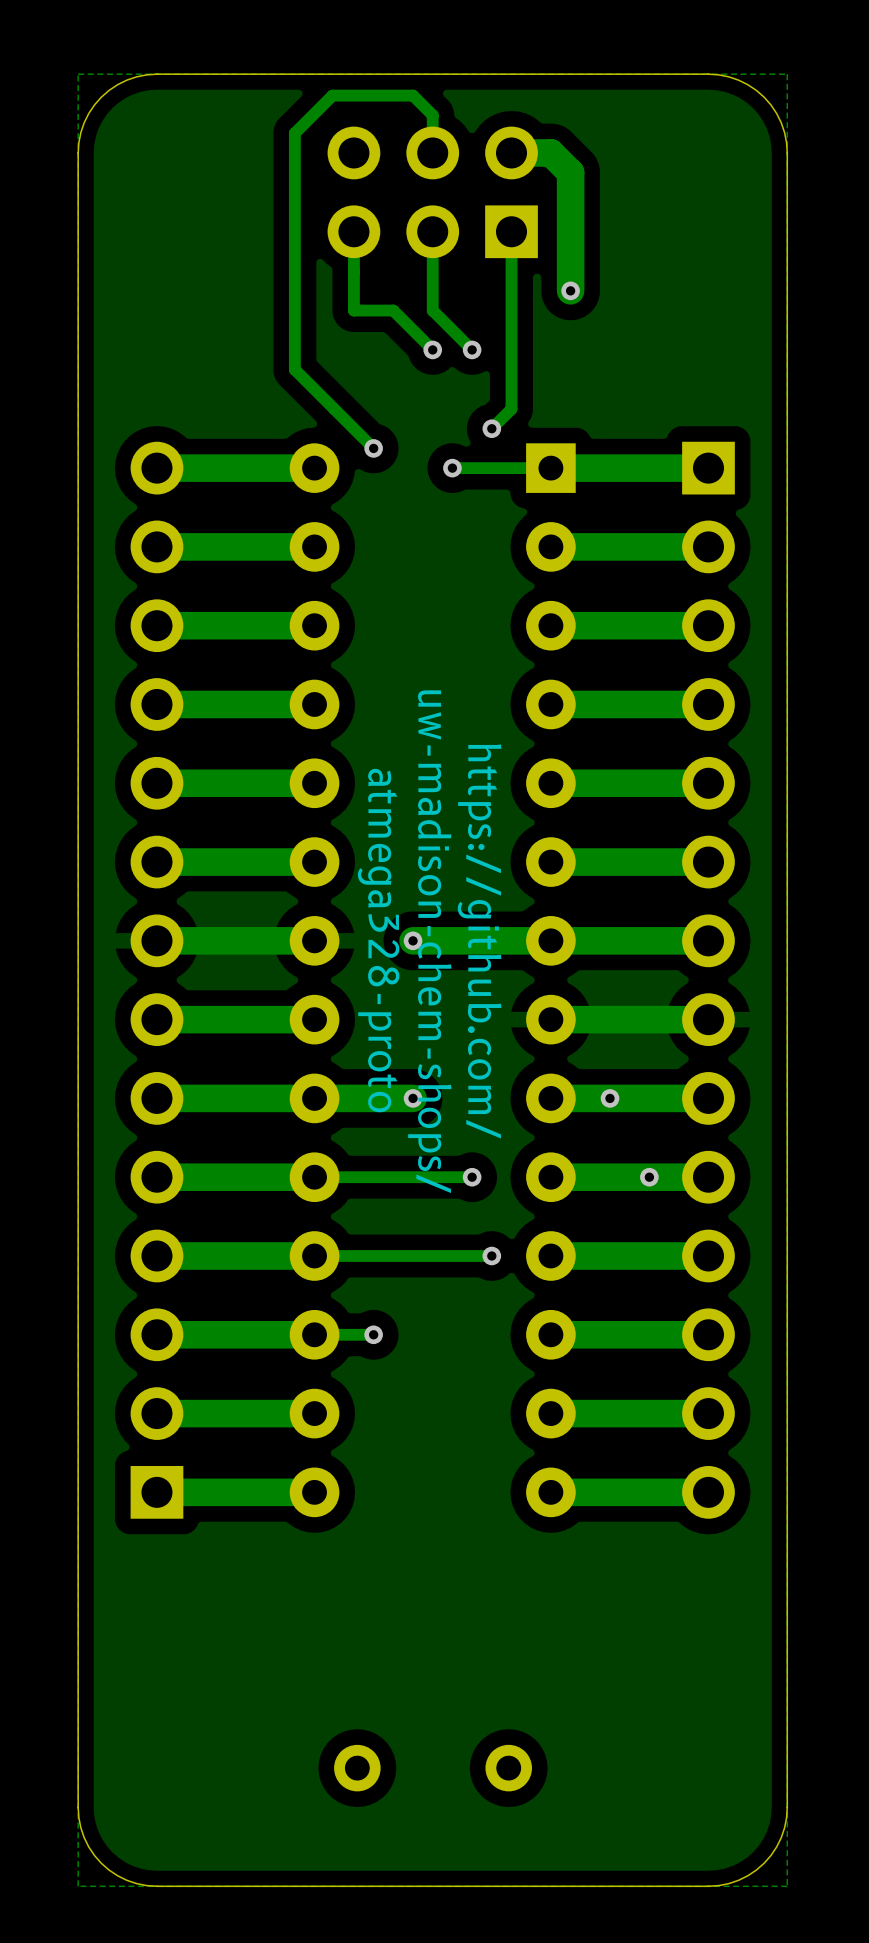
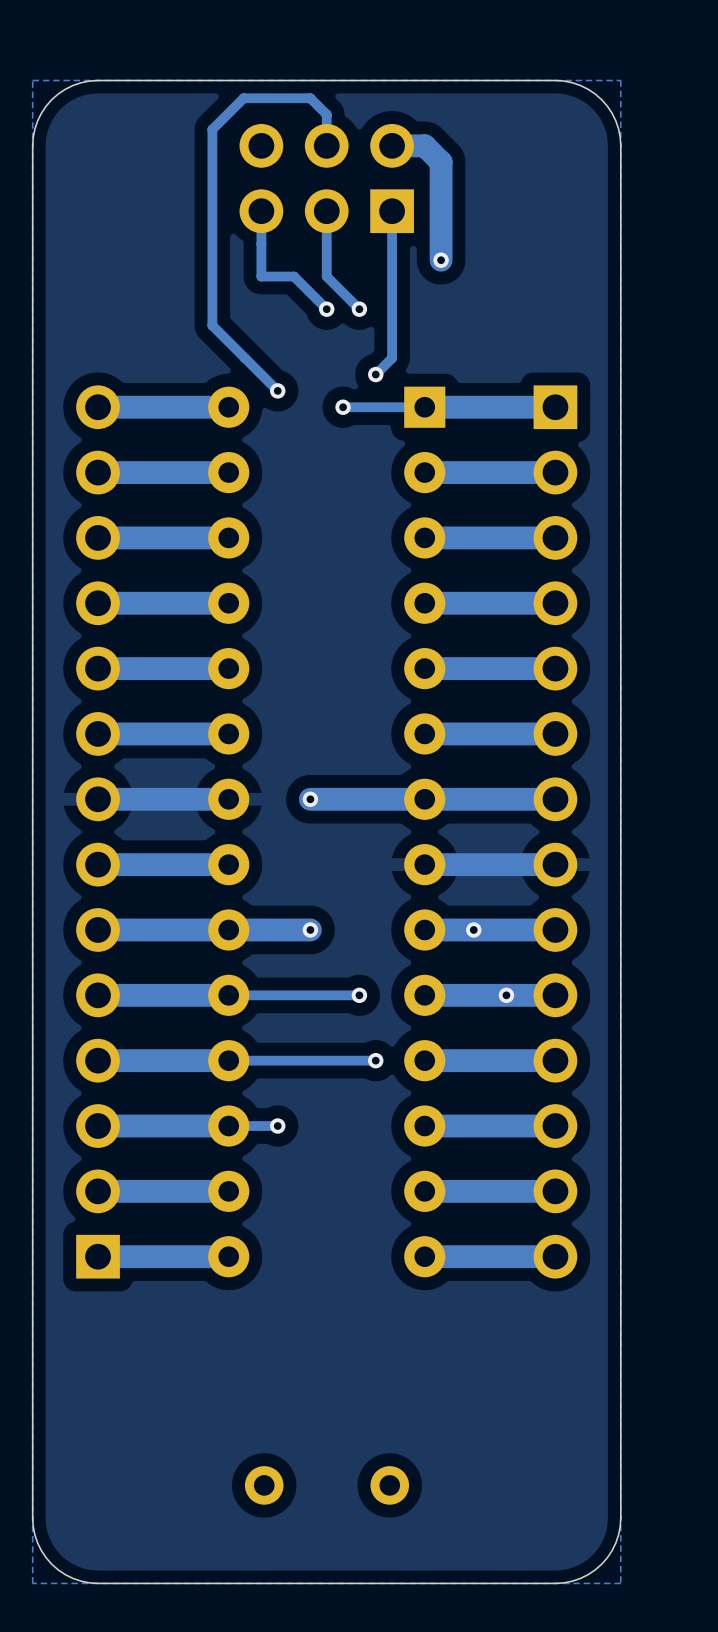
text: atmega328-proto (378, 940) -> none
text: uw-madison-chem-shops/ (429, 941) -> none
text: https://github.com/ (479, 941) -> none

